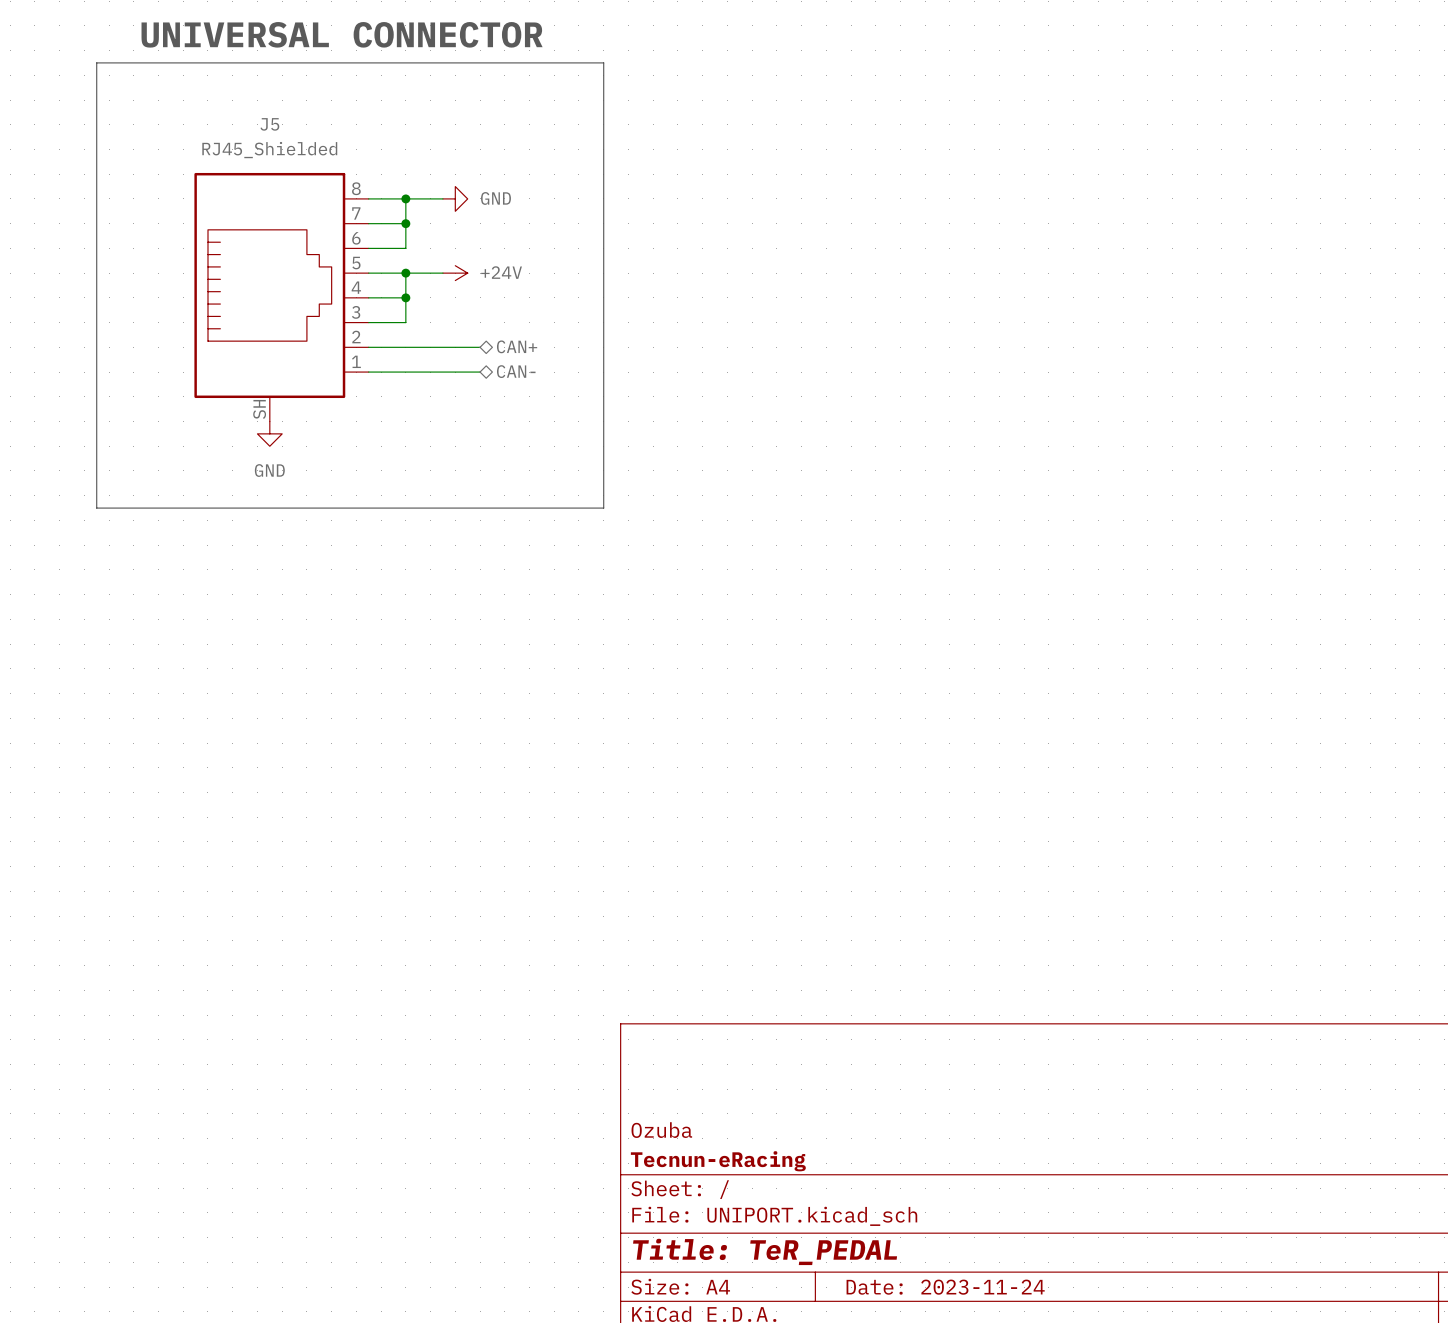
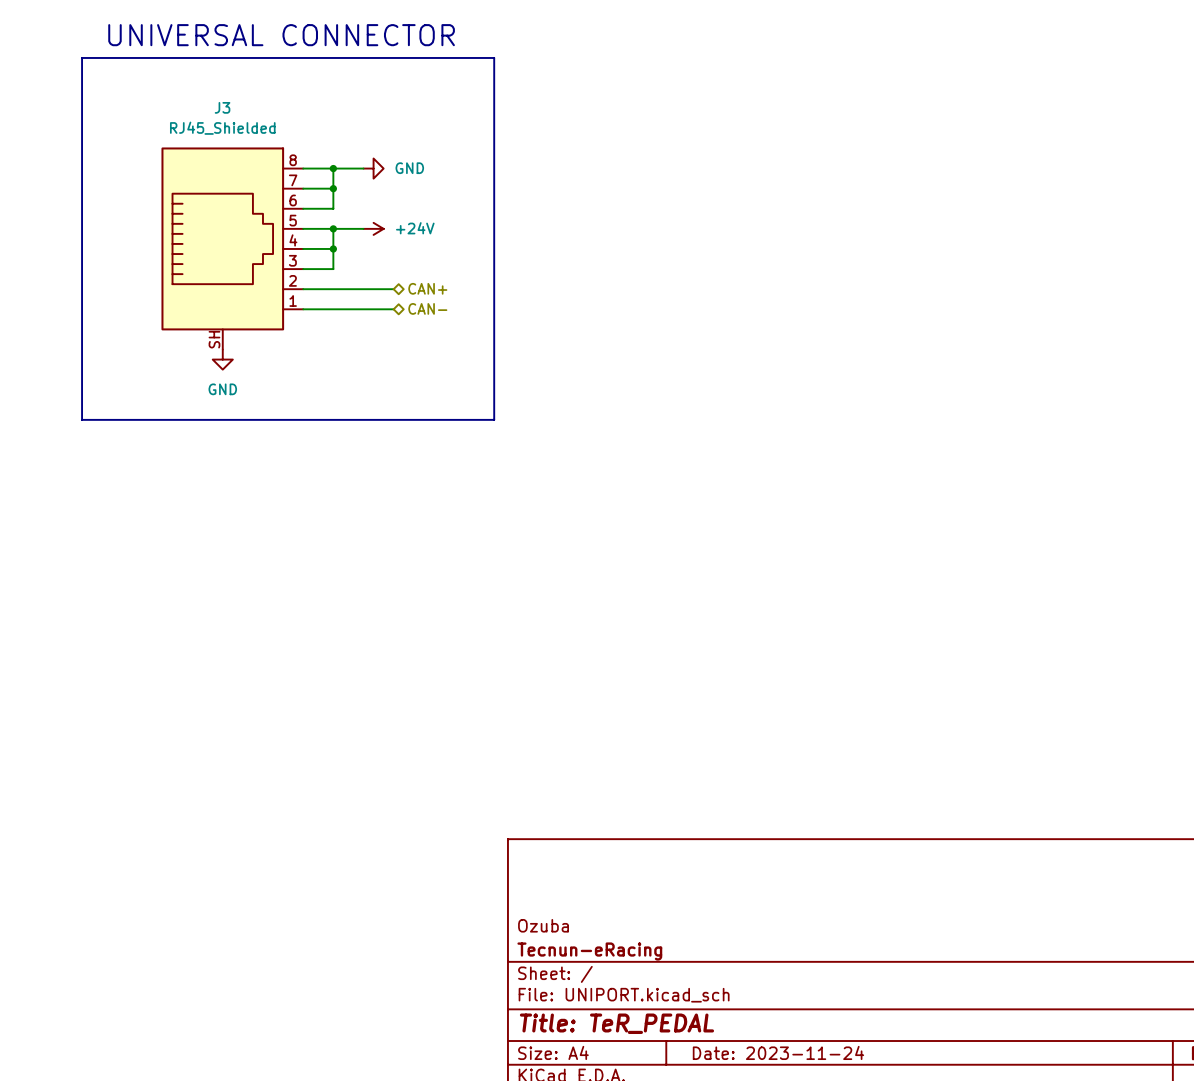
J5 name: J5 (269, 124) -> J3 (222, 107)

